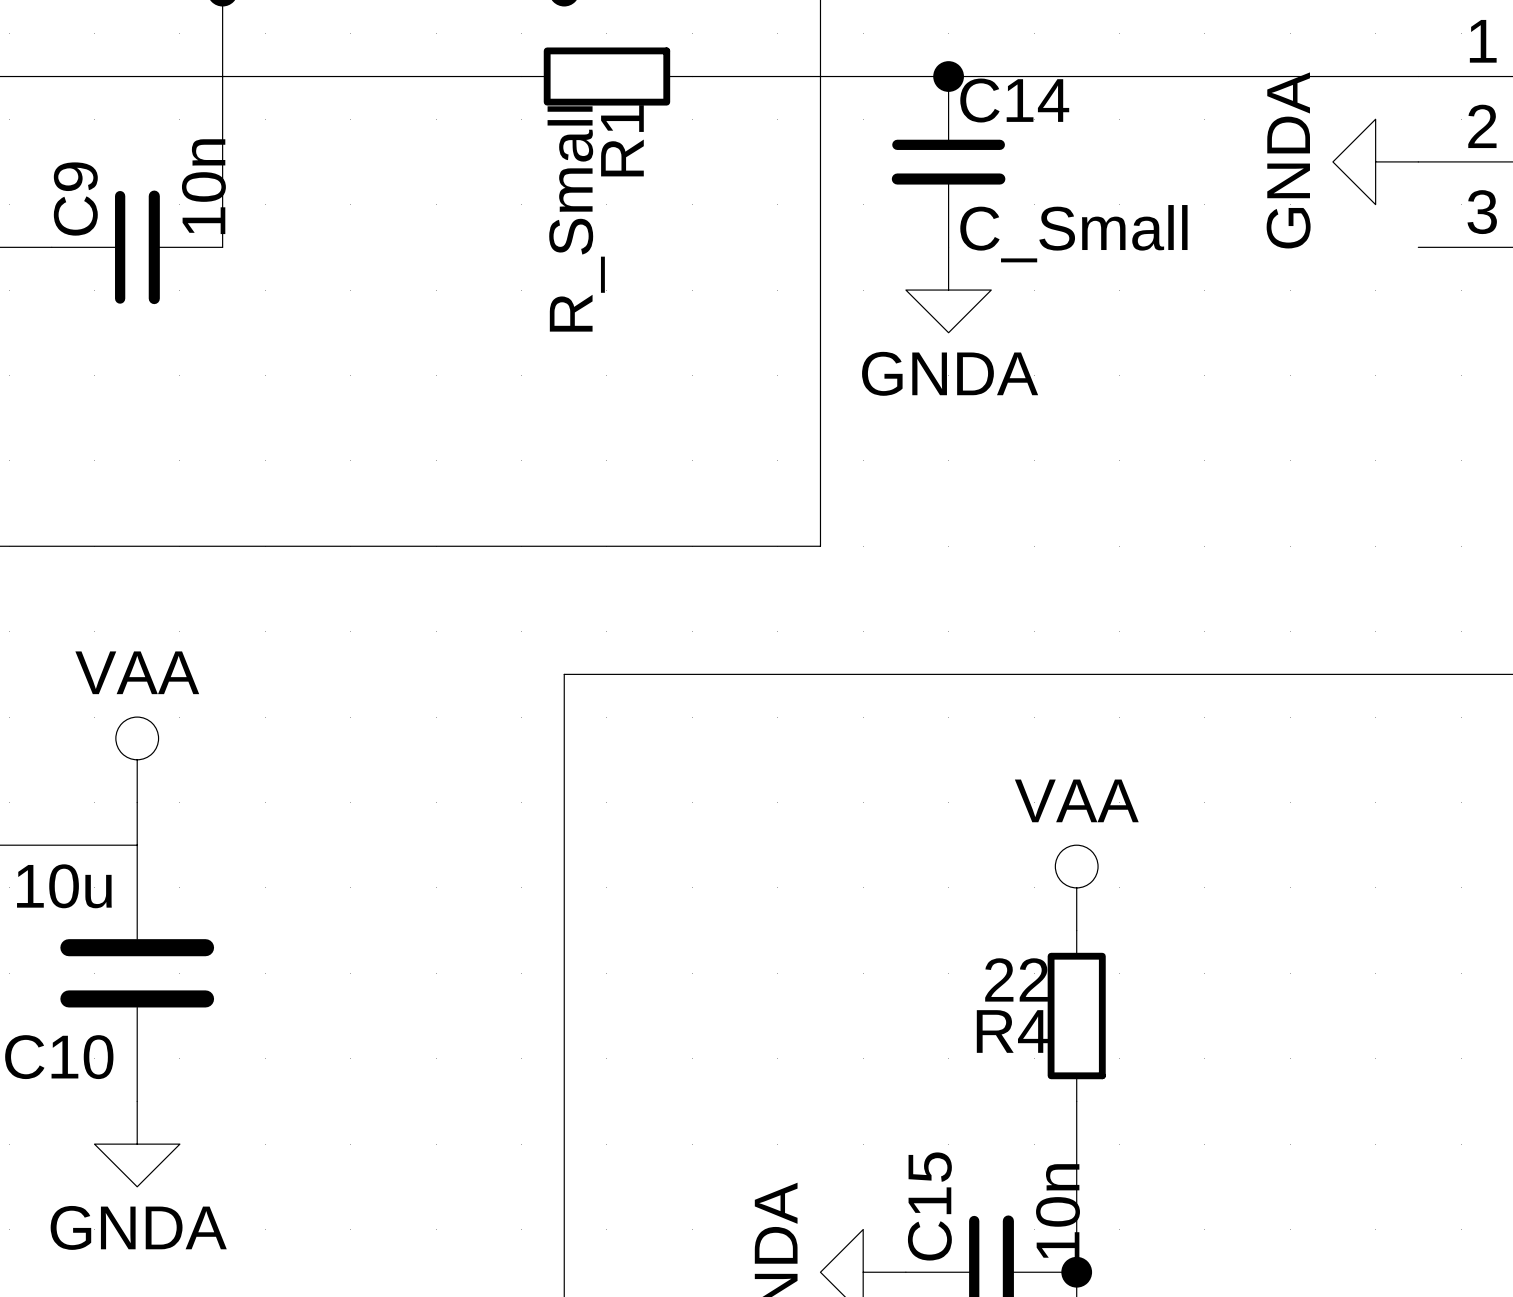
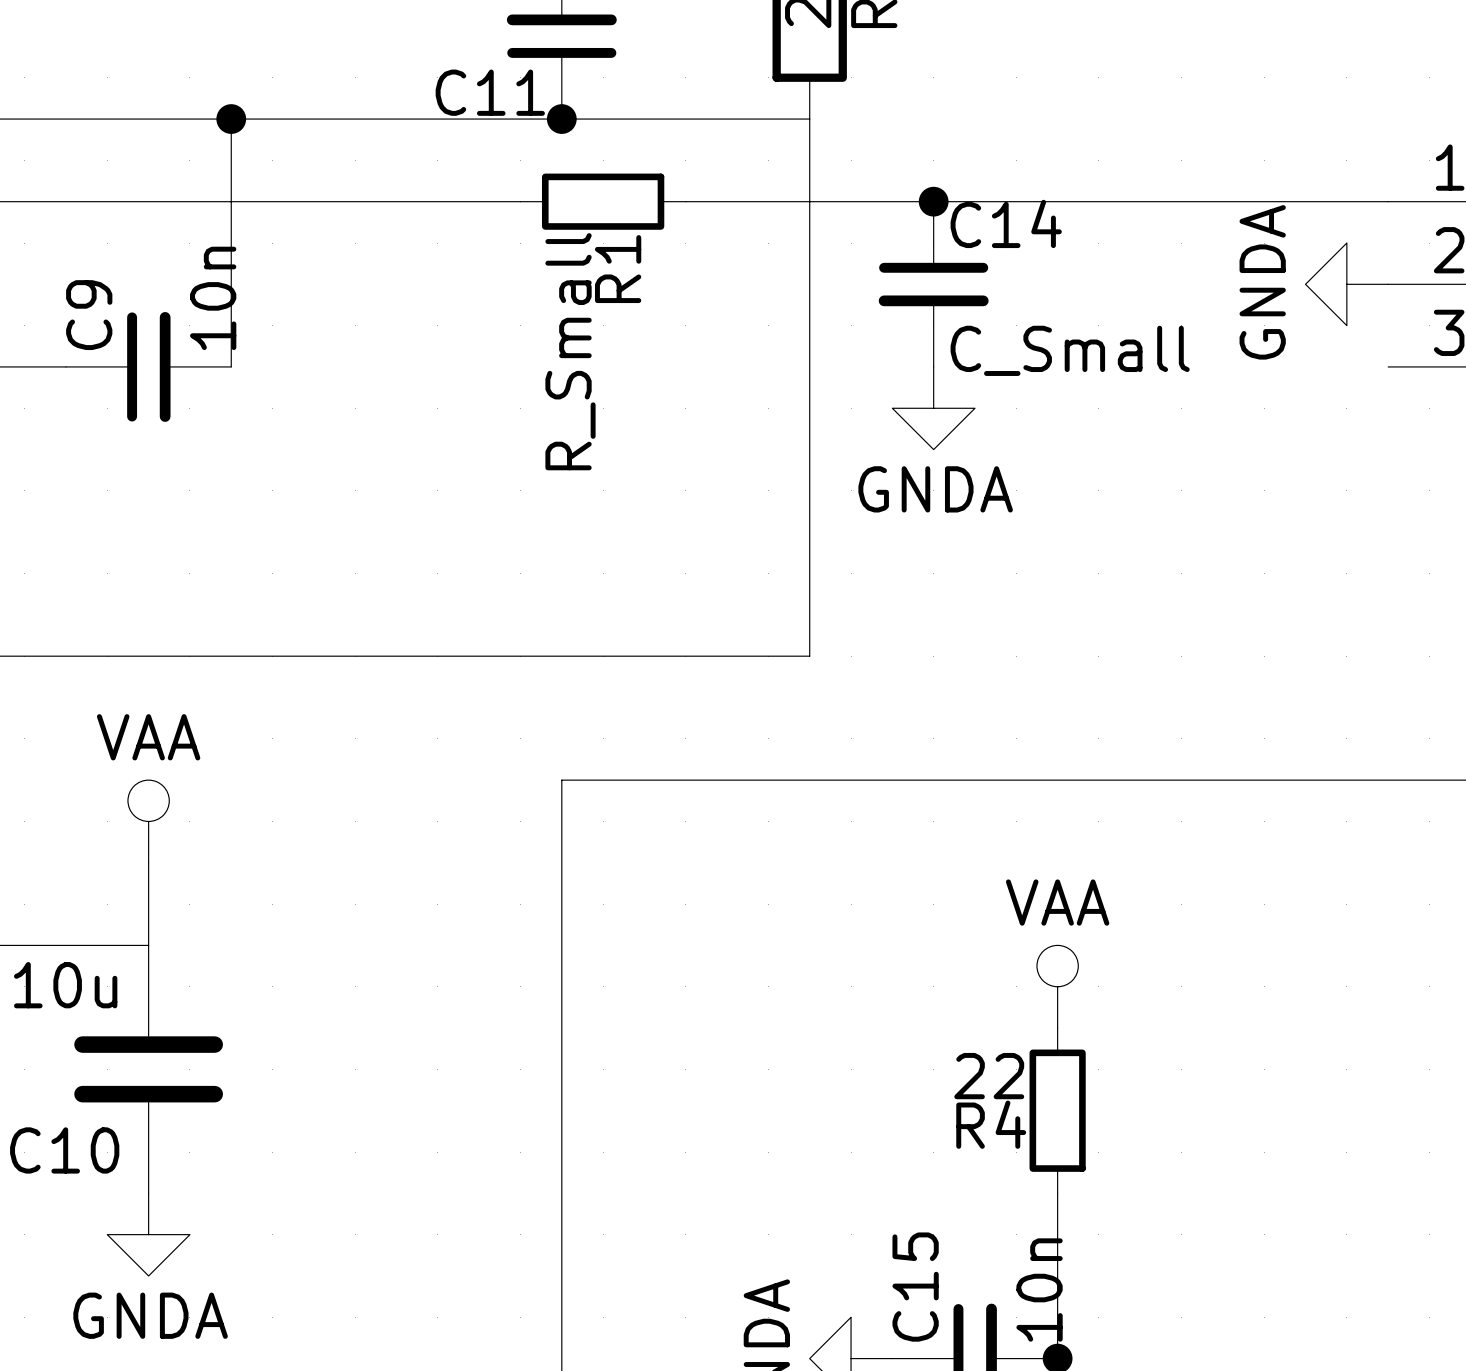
power symbol position: VAA (137, 759) -> VAA (148, 821)

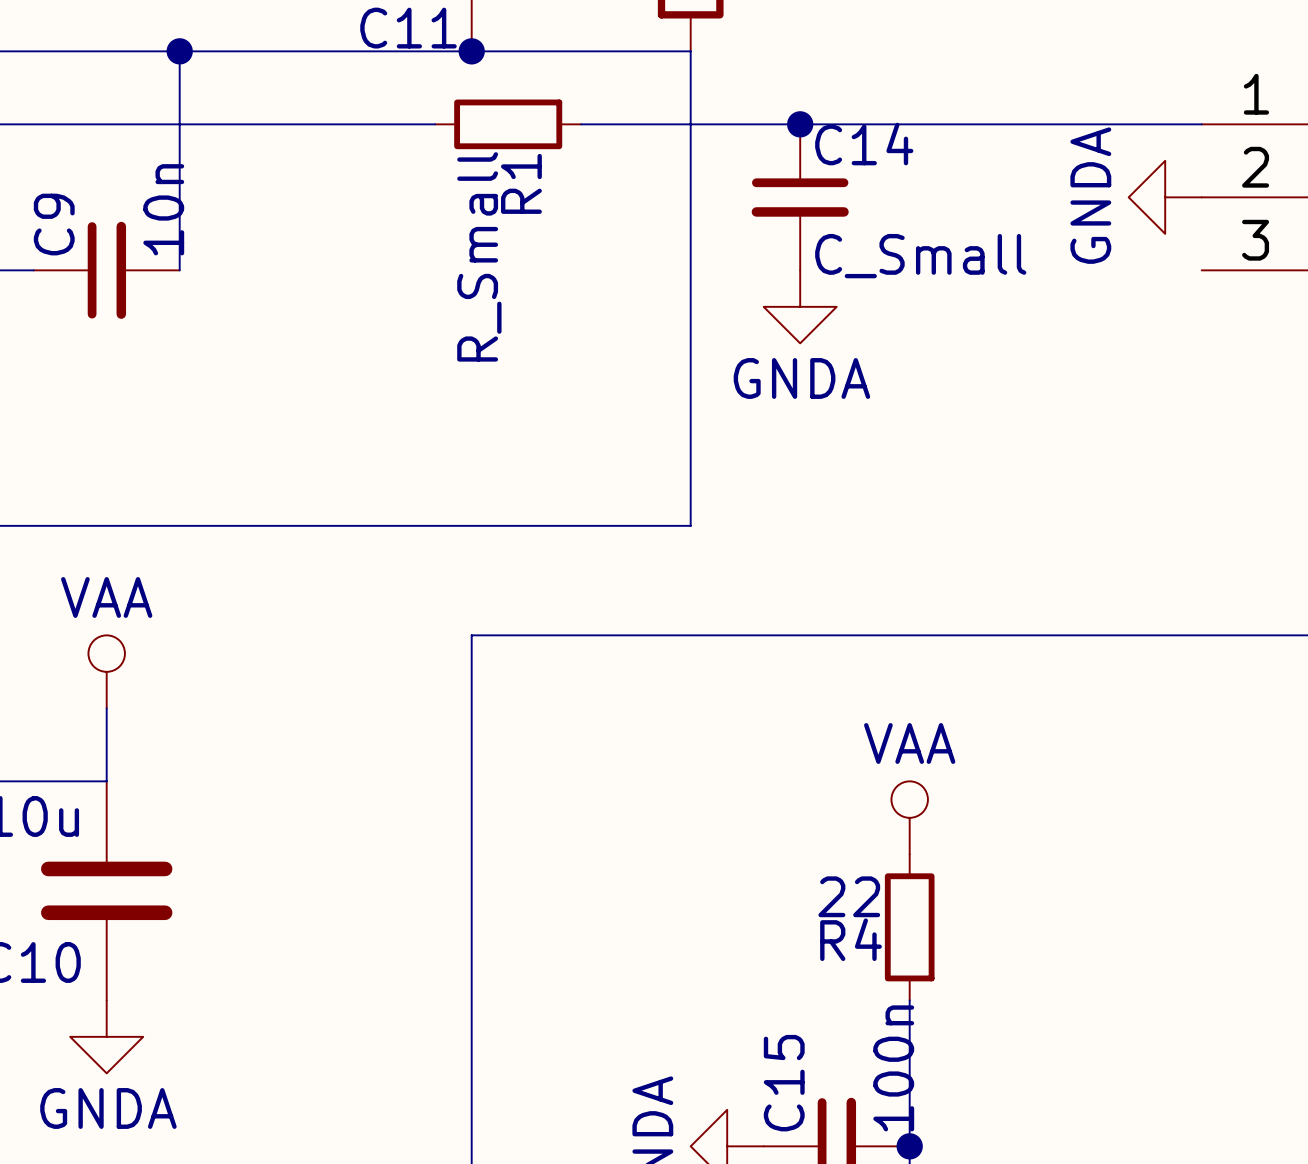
C15 value: 10n (1039, 1290) -> 100n (893, 1068)

